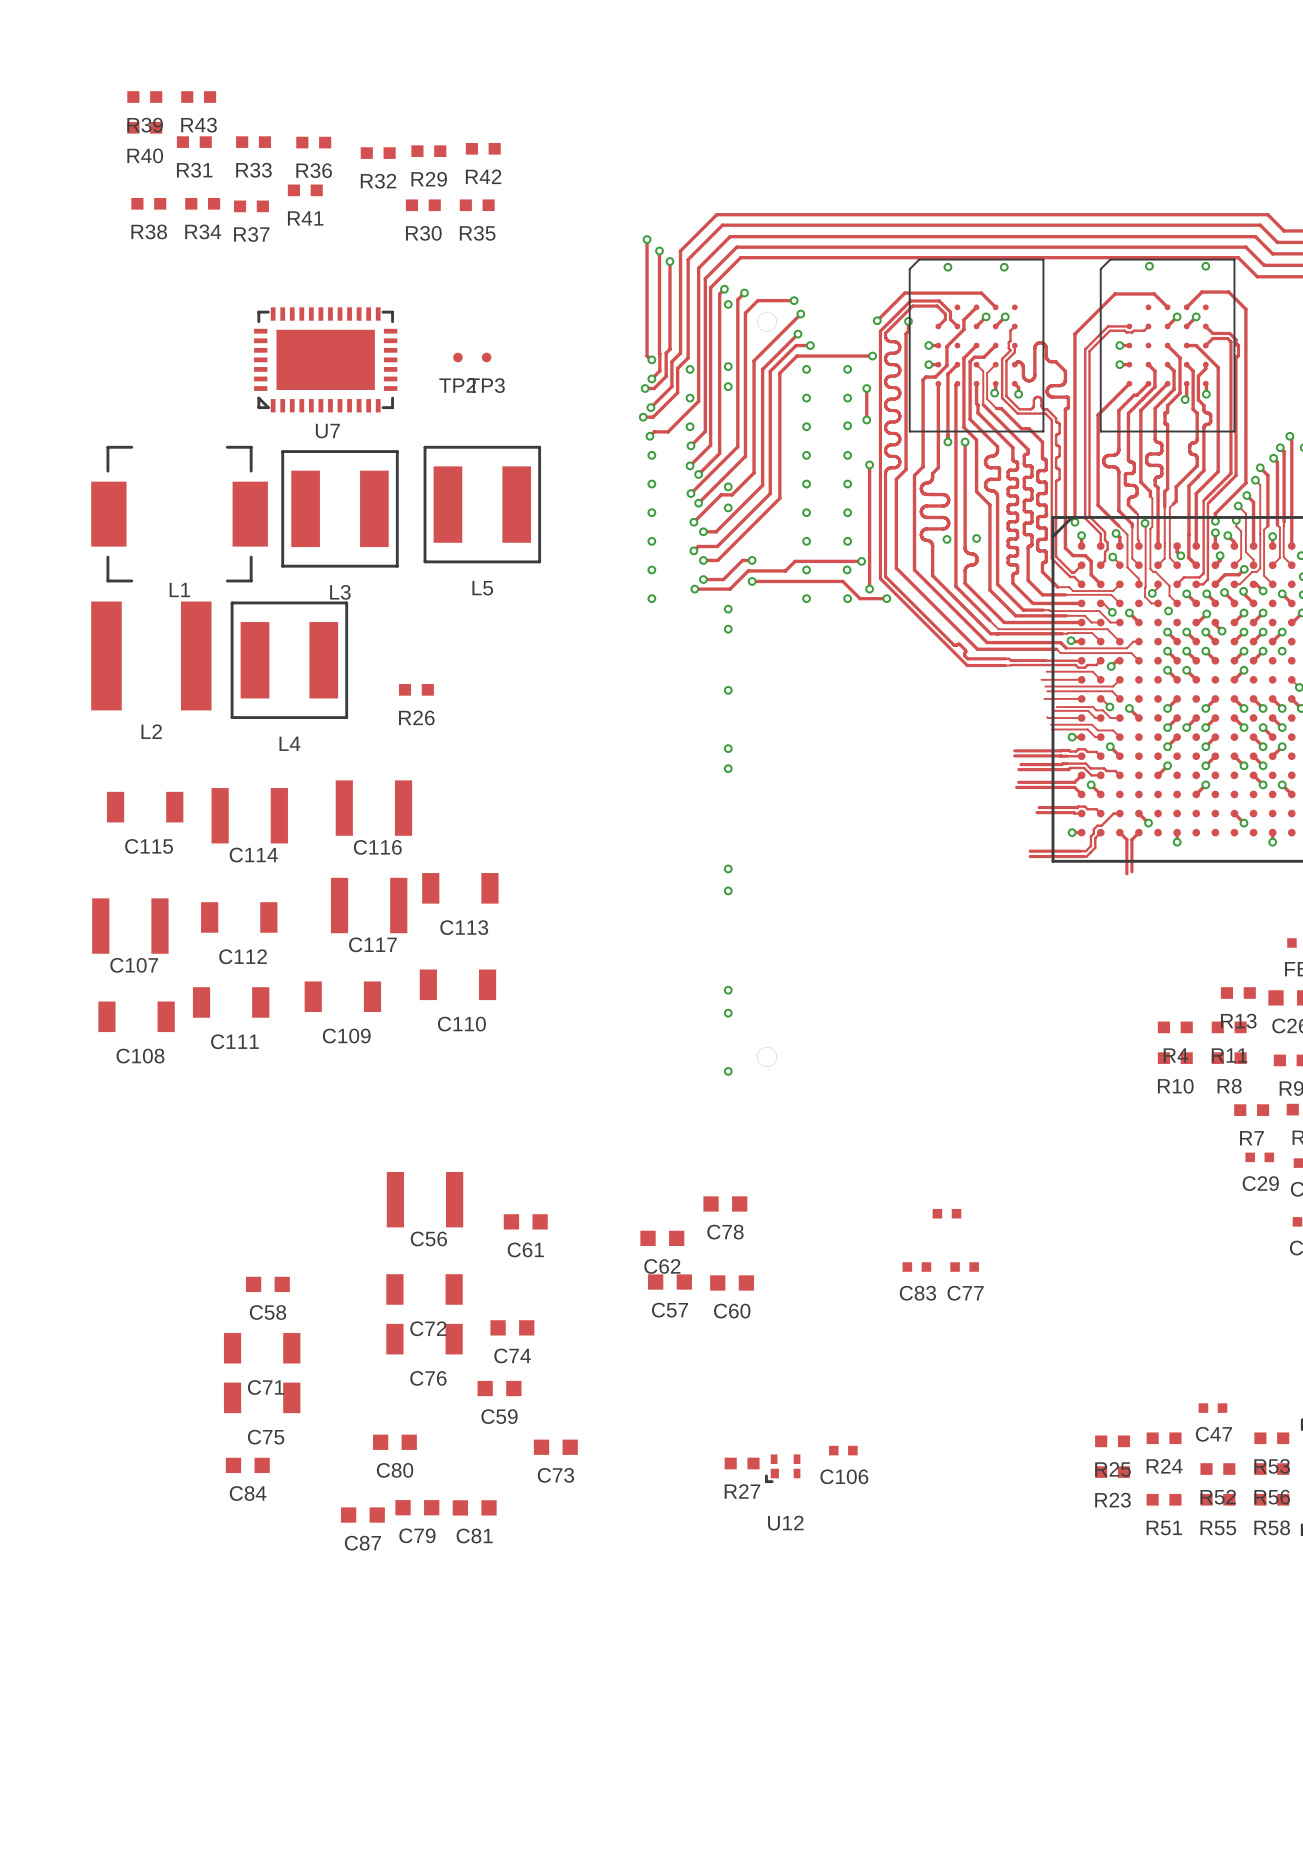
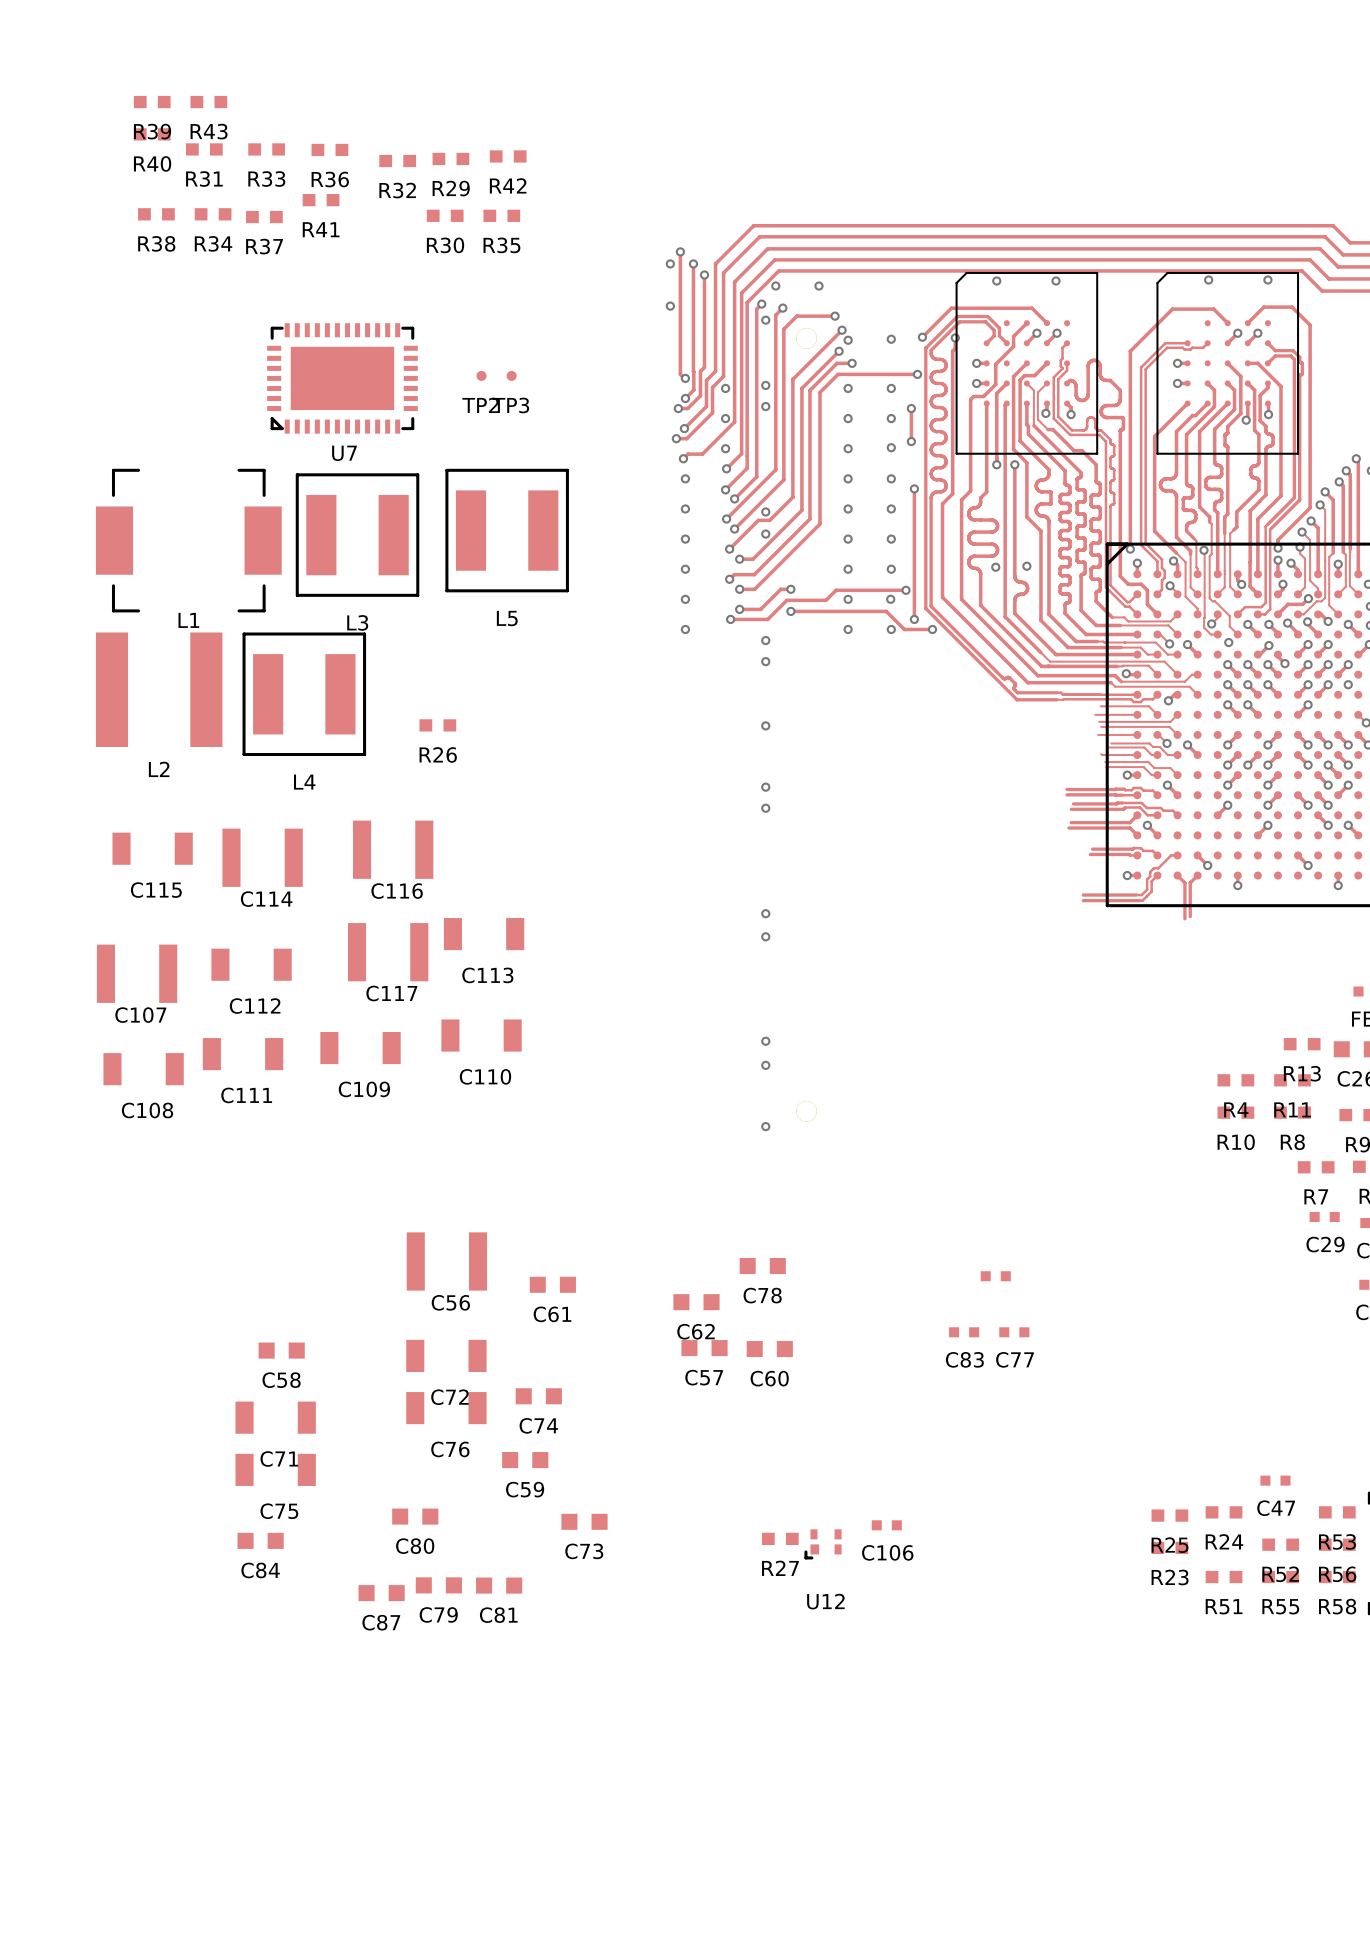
via: none -> (670, 263)
via: none -> (775, 286)
via: none -> (819, 286)
via: none -> (670, 306)
via: none -> (891, 339)
via: none -> (848, 340)

